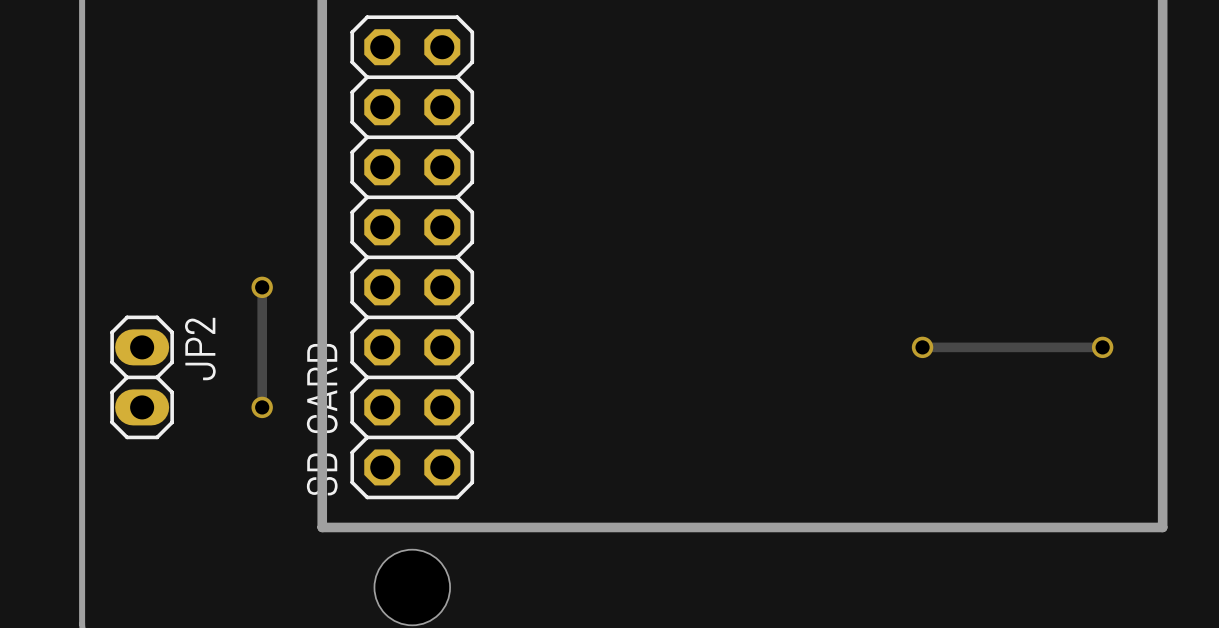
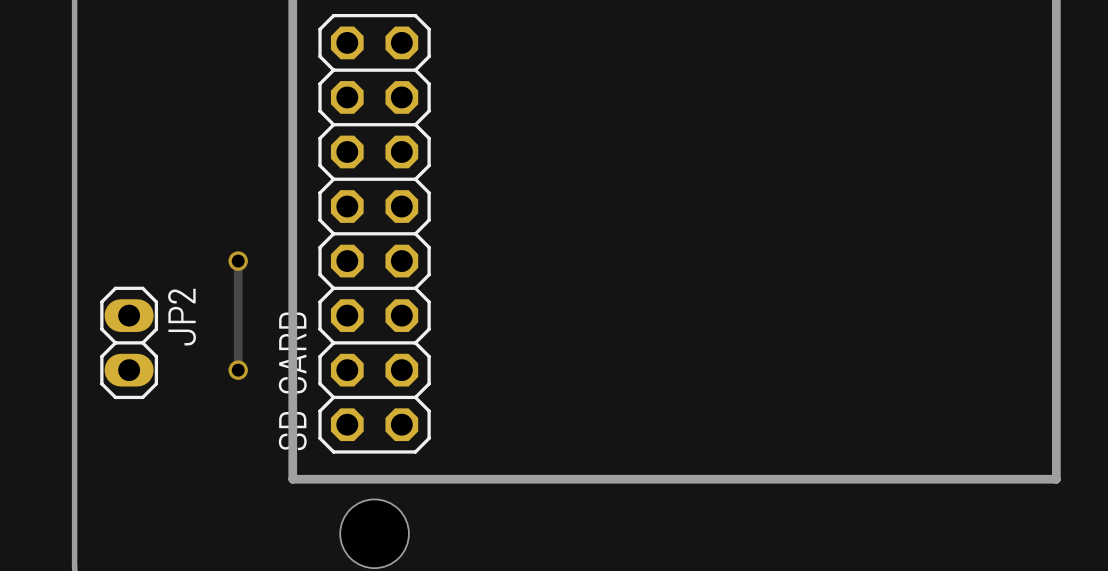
track: (922, 347) (1102, 347) -> none
via: (922, 347) -> none
via: (1102, 347) -> none

